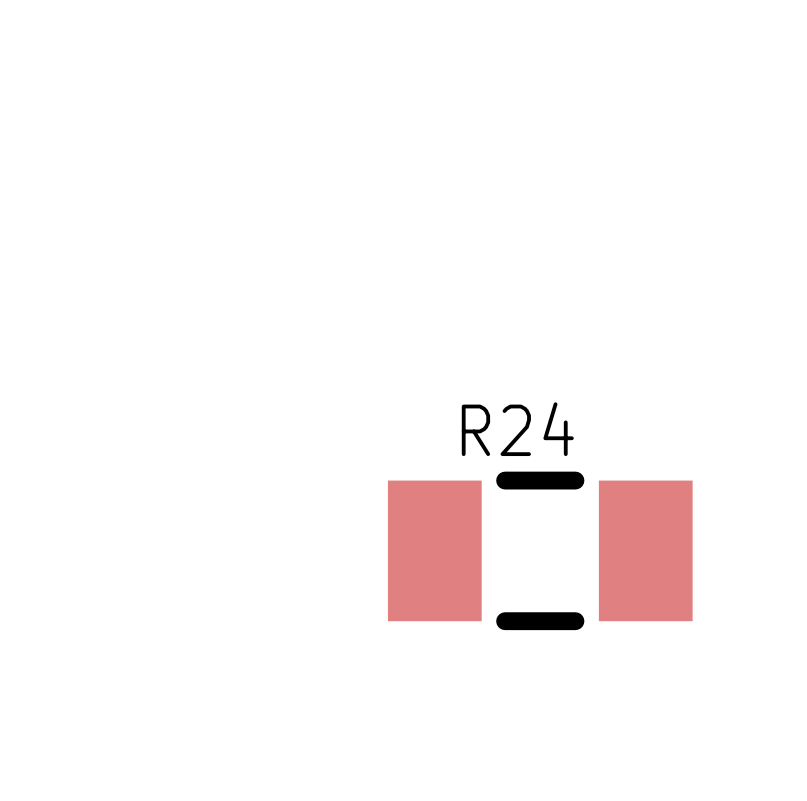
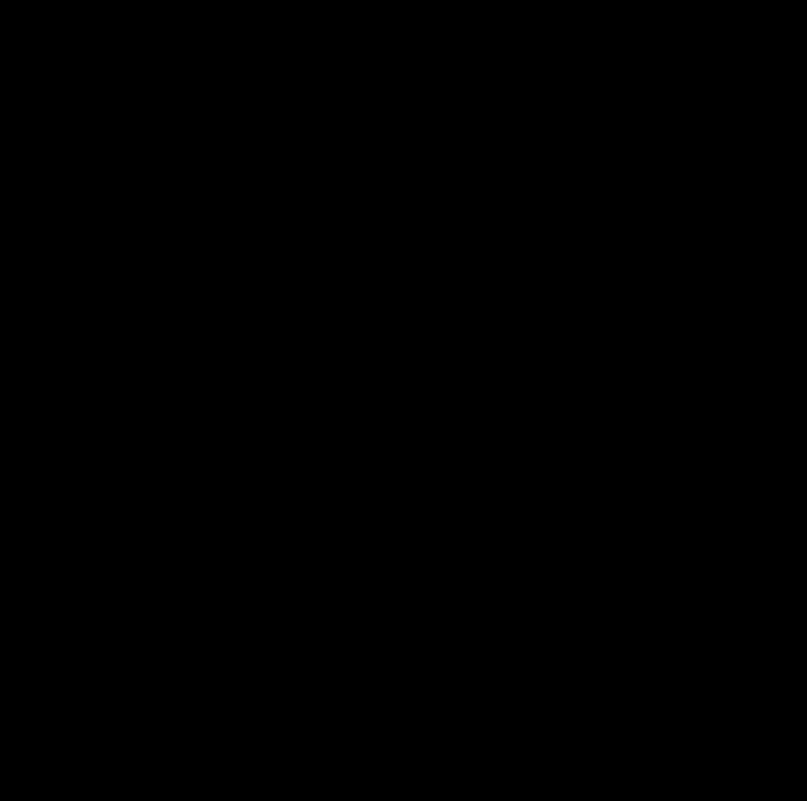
R24: (540, 550) -> none

